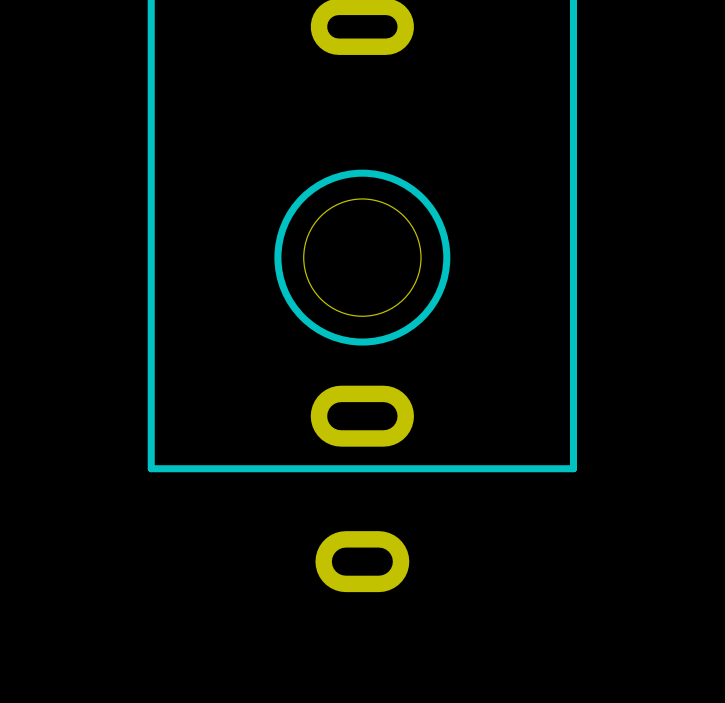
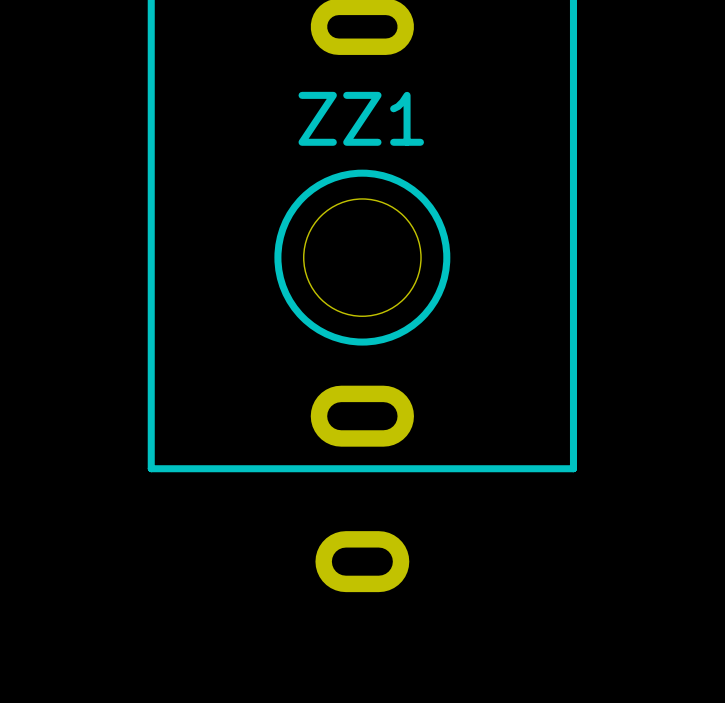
ZZ1 name: none -> ZZ1 (361, 118)

